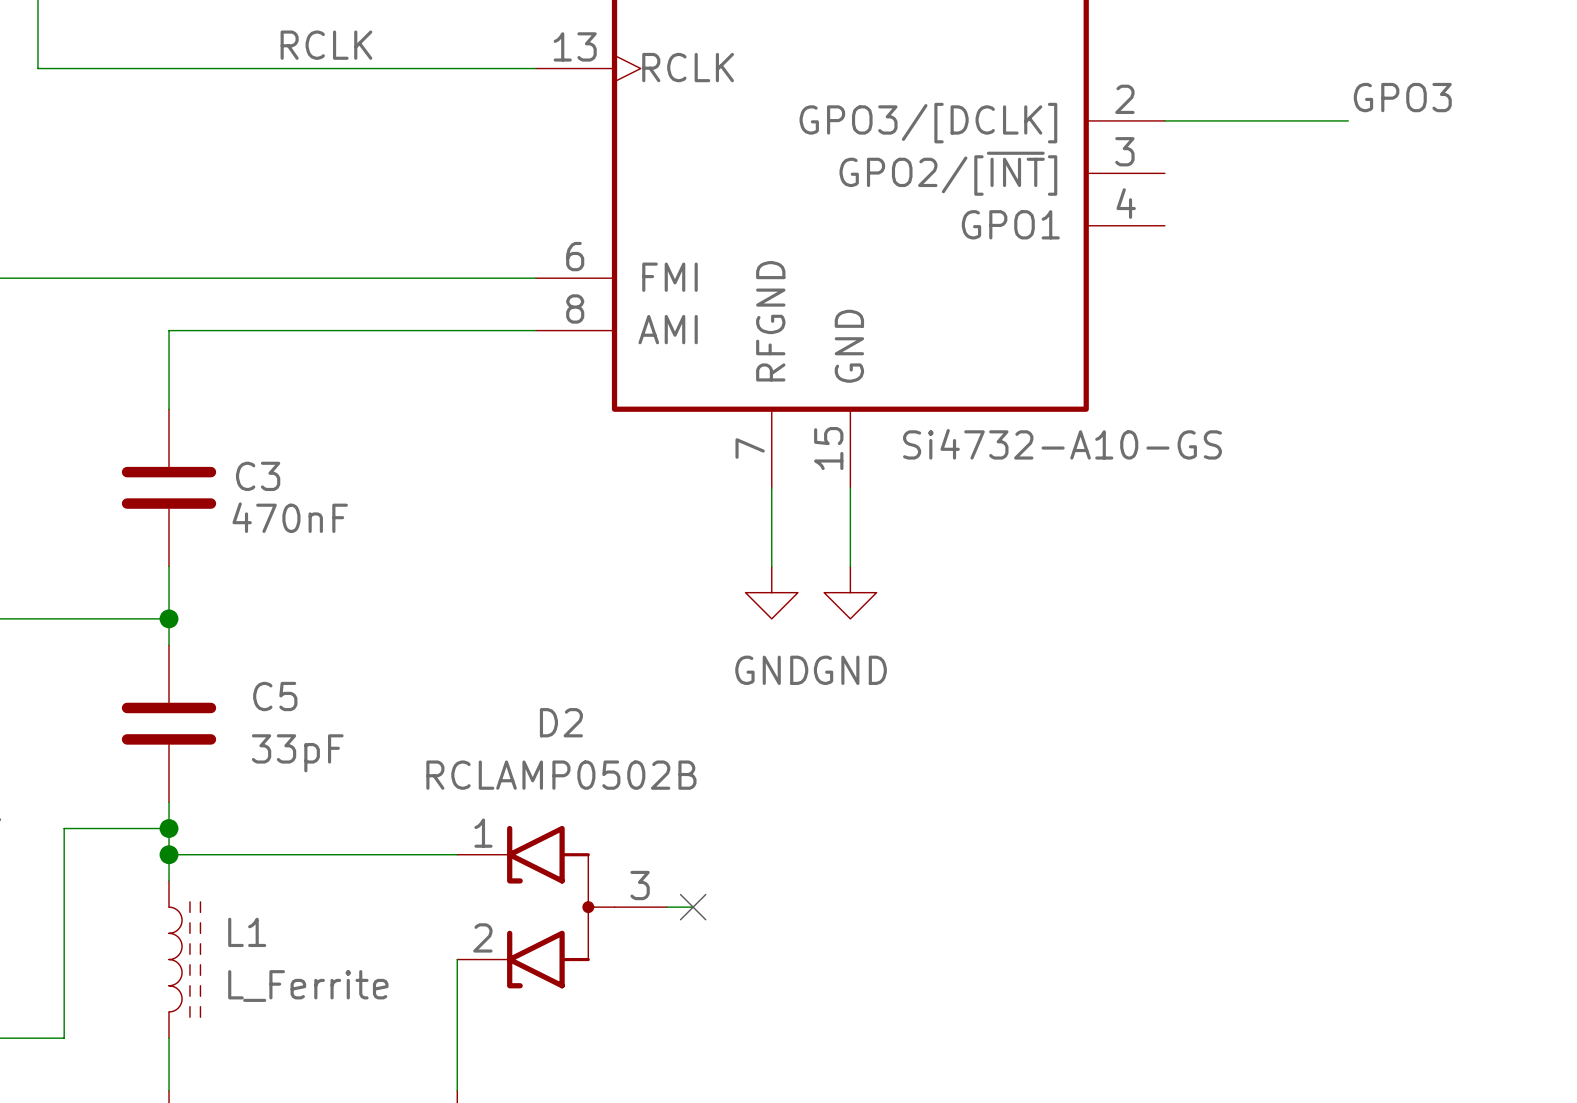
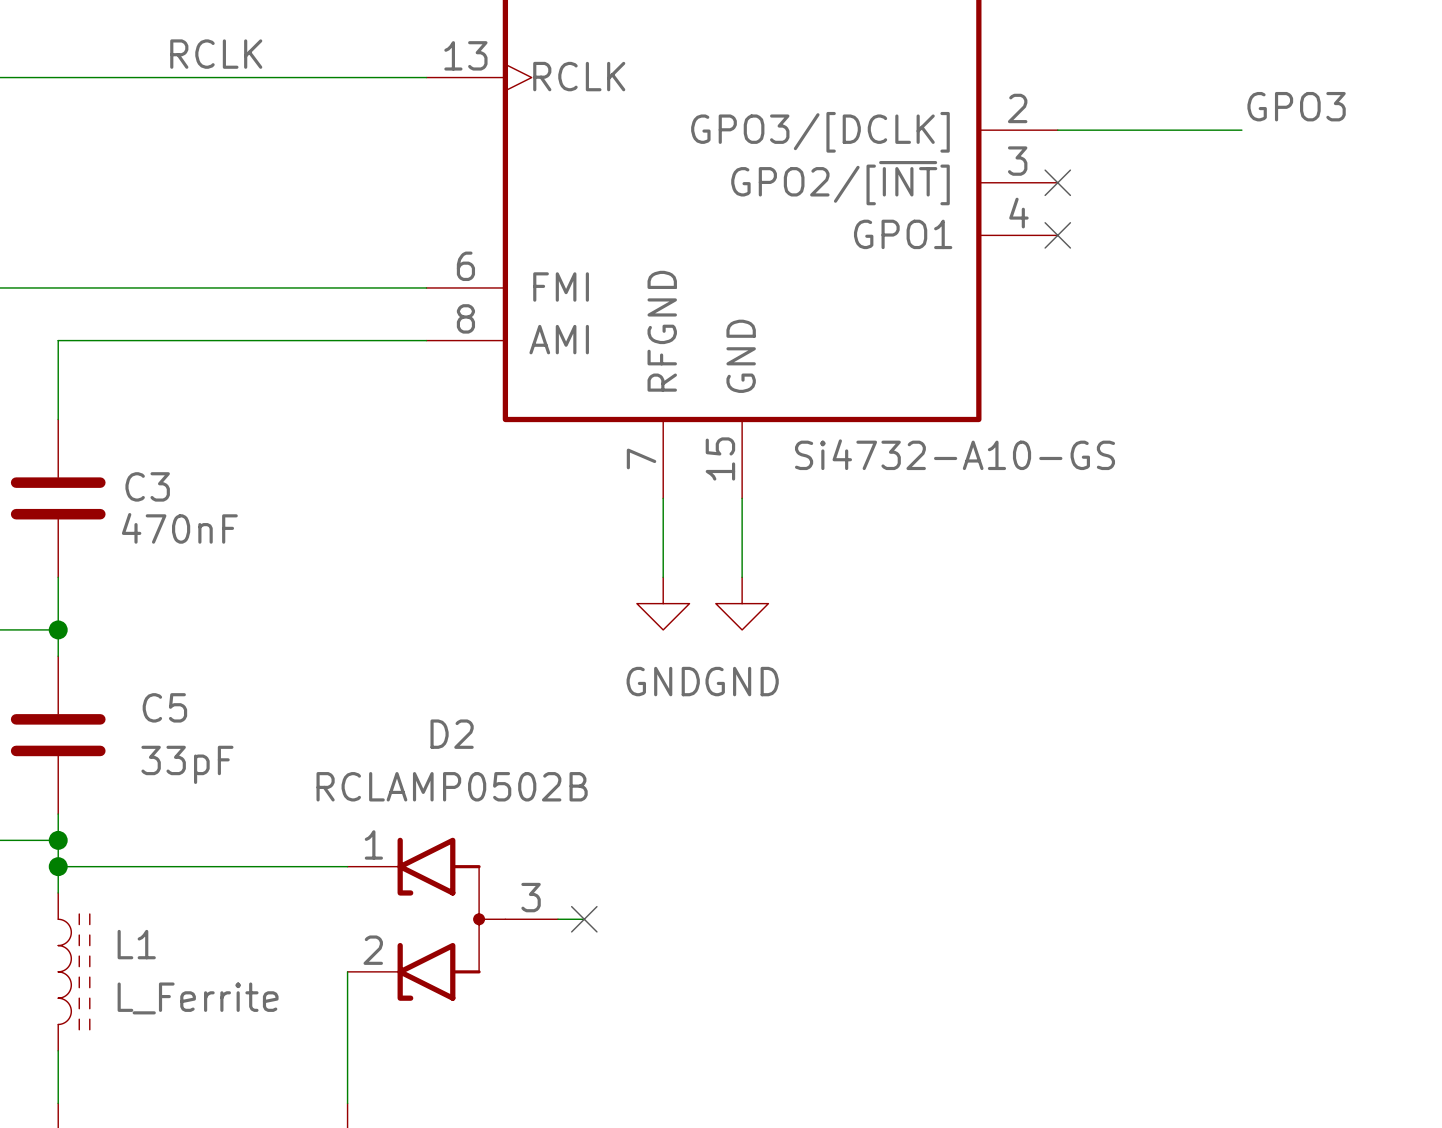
no-connect mark: none -> (1057, 182)
no-connect mark: none -> (1057, 235)

